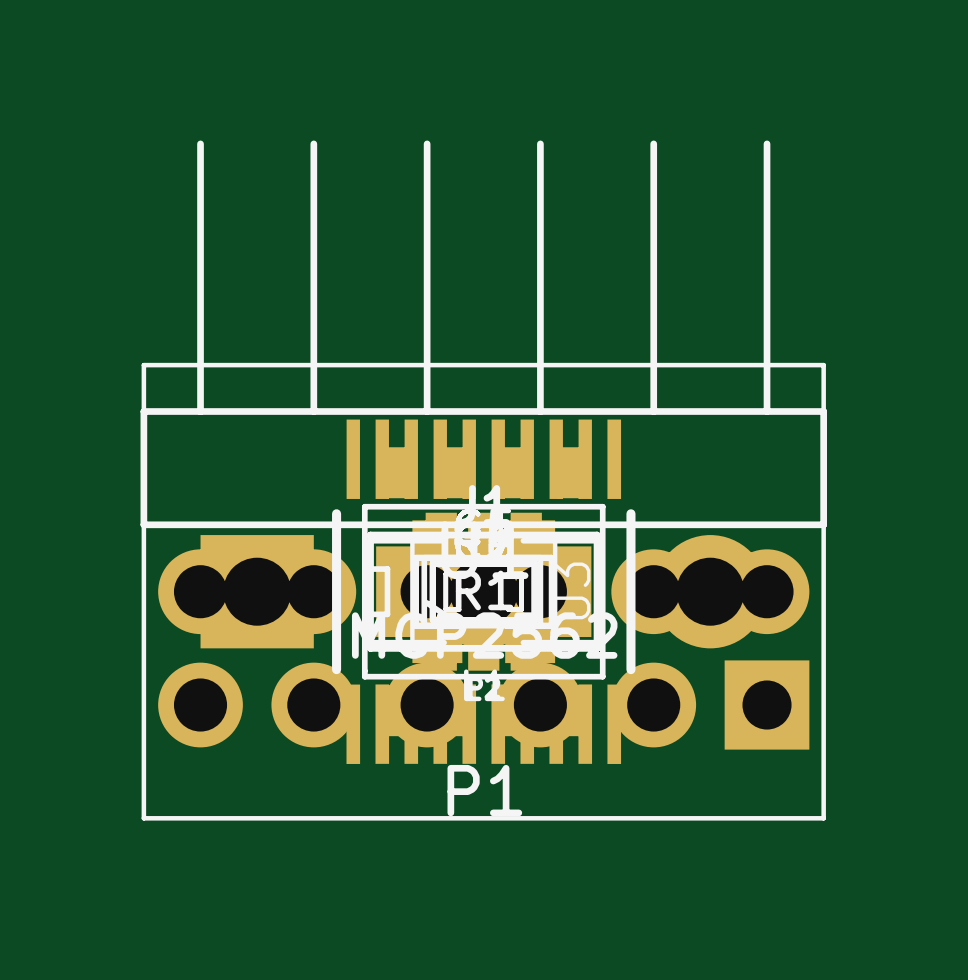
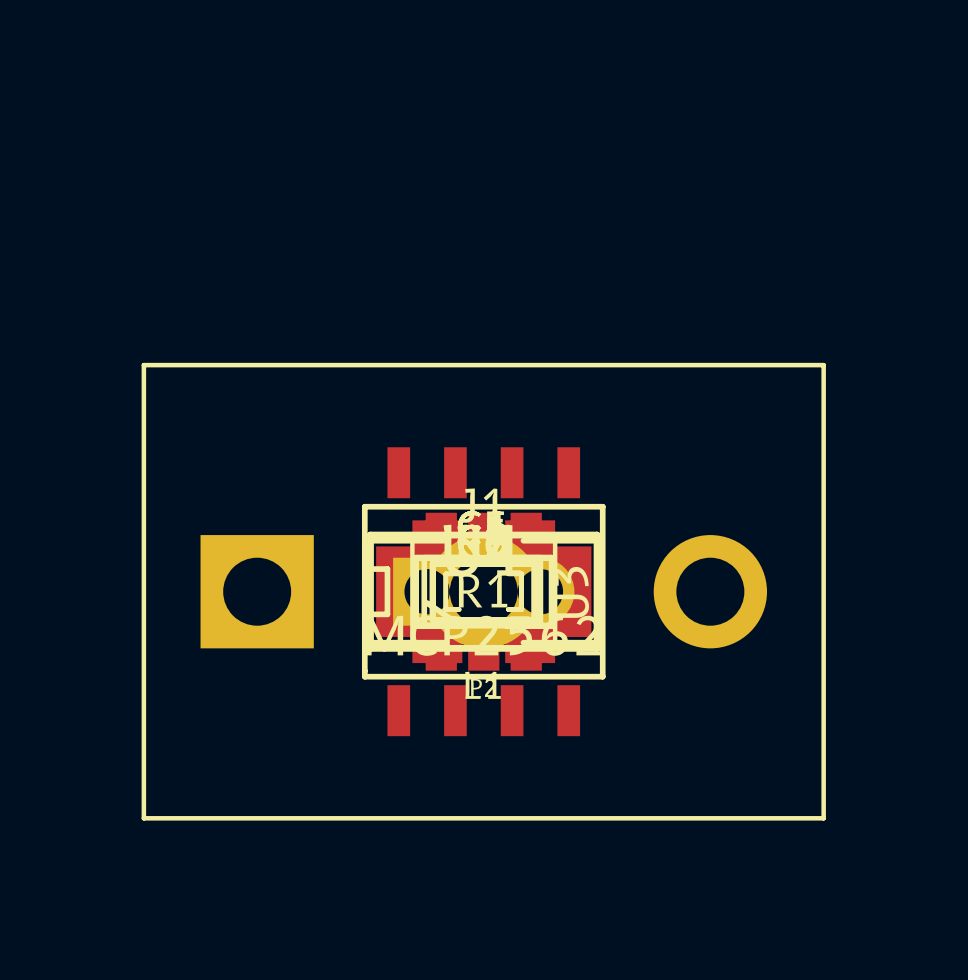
P1: (483, 445) -> none
part: (483, 591) -> none

